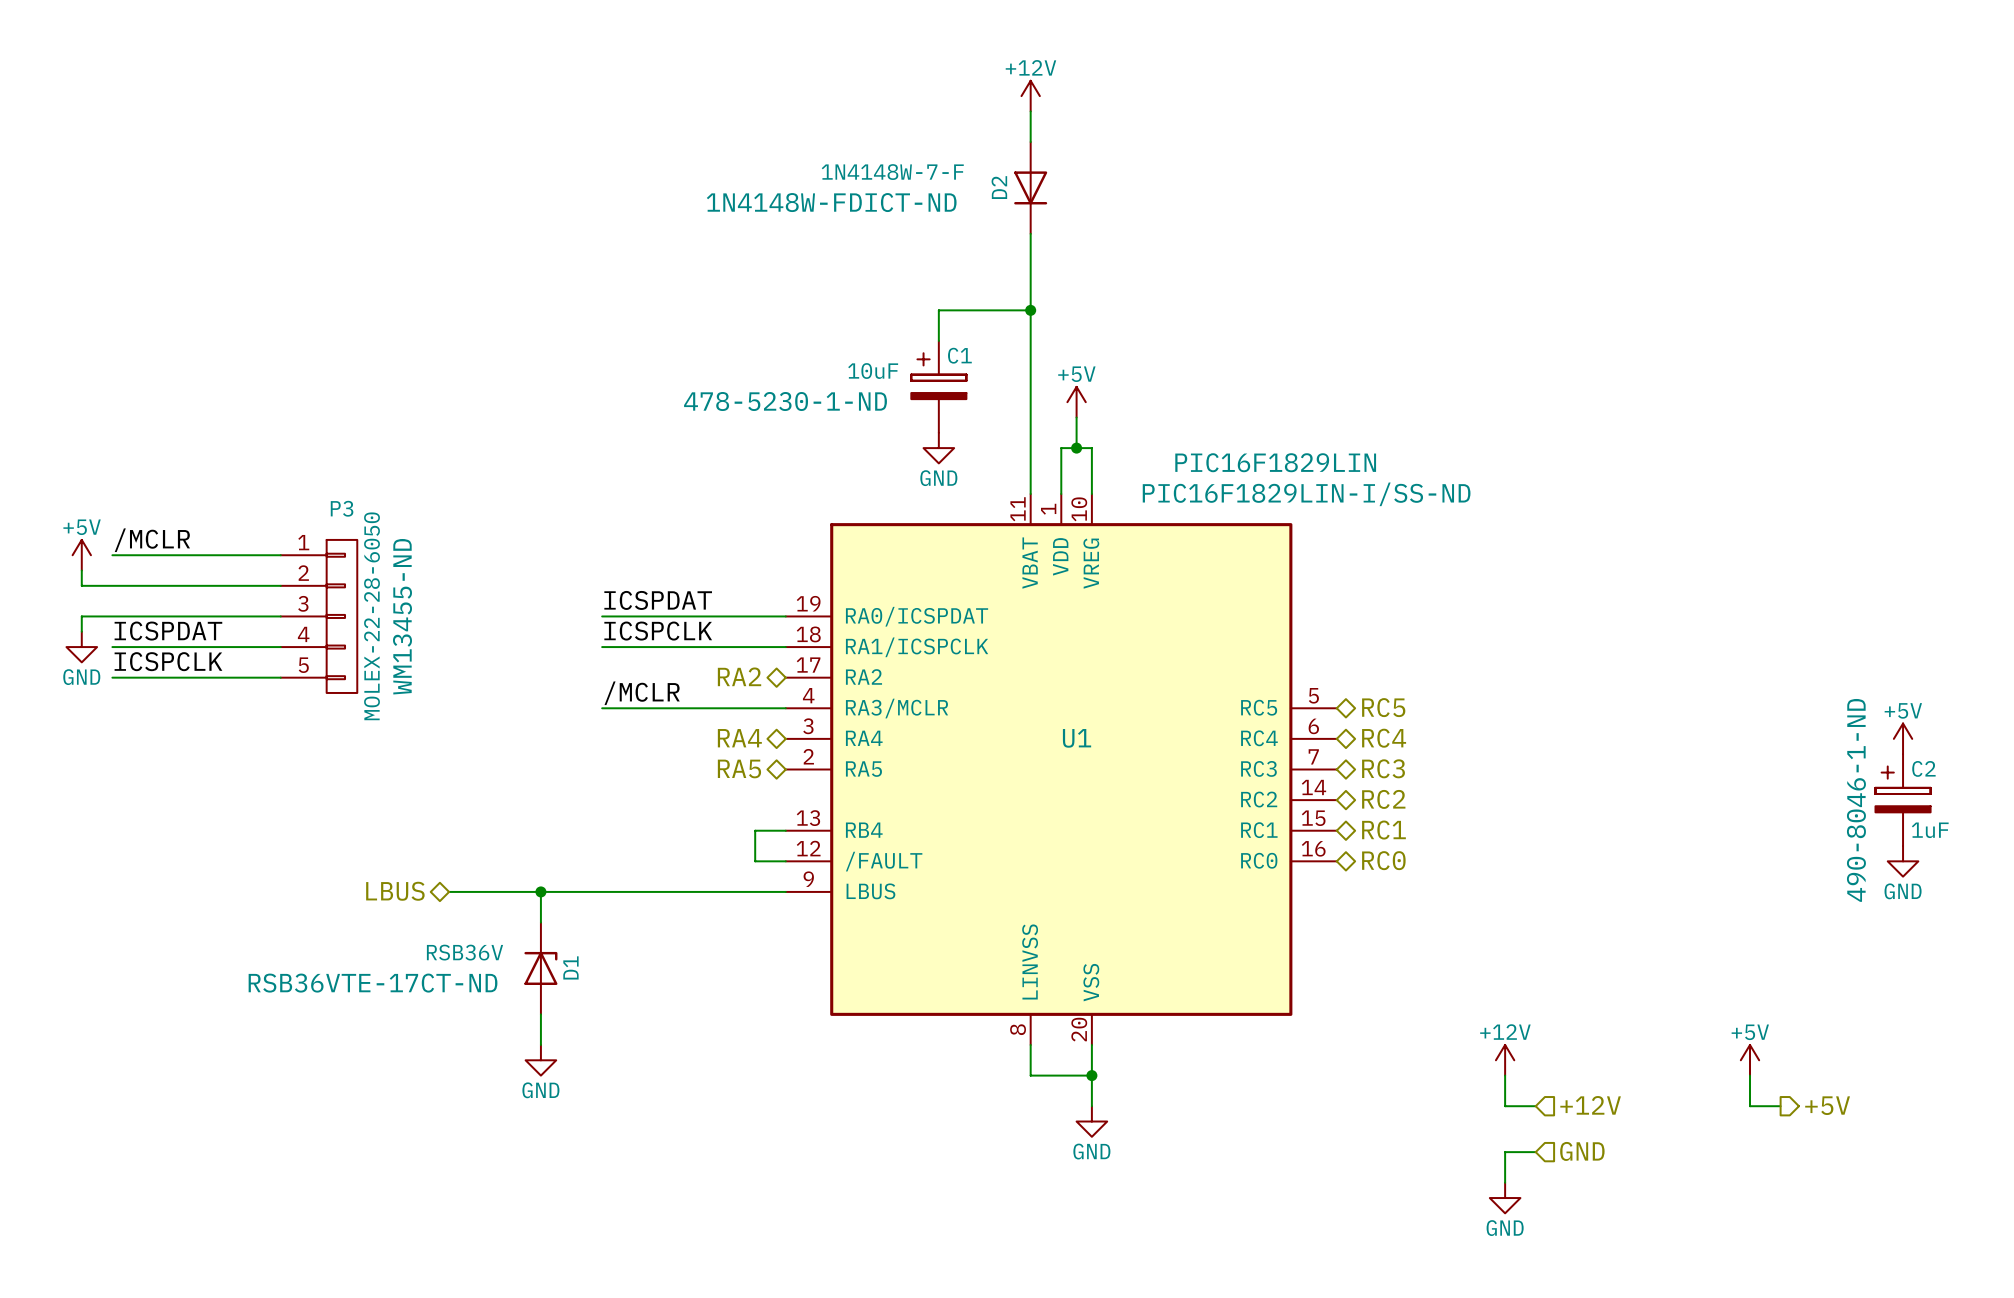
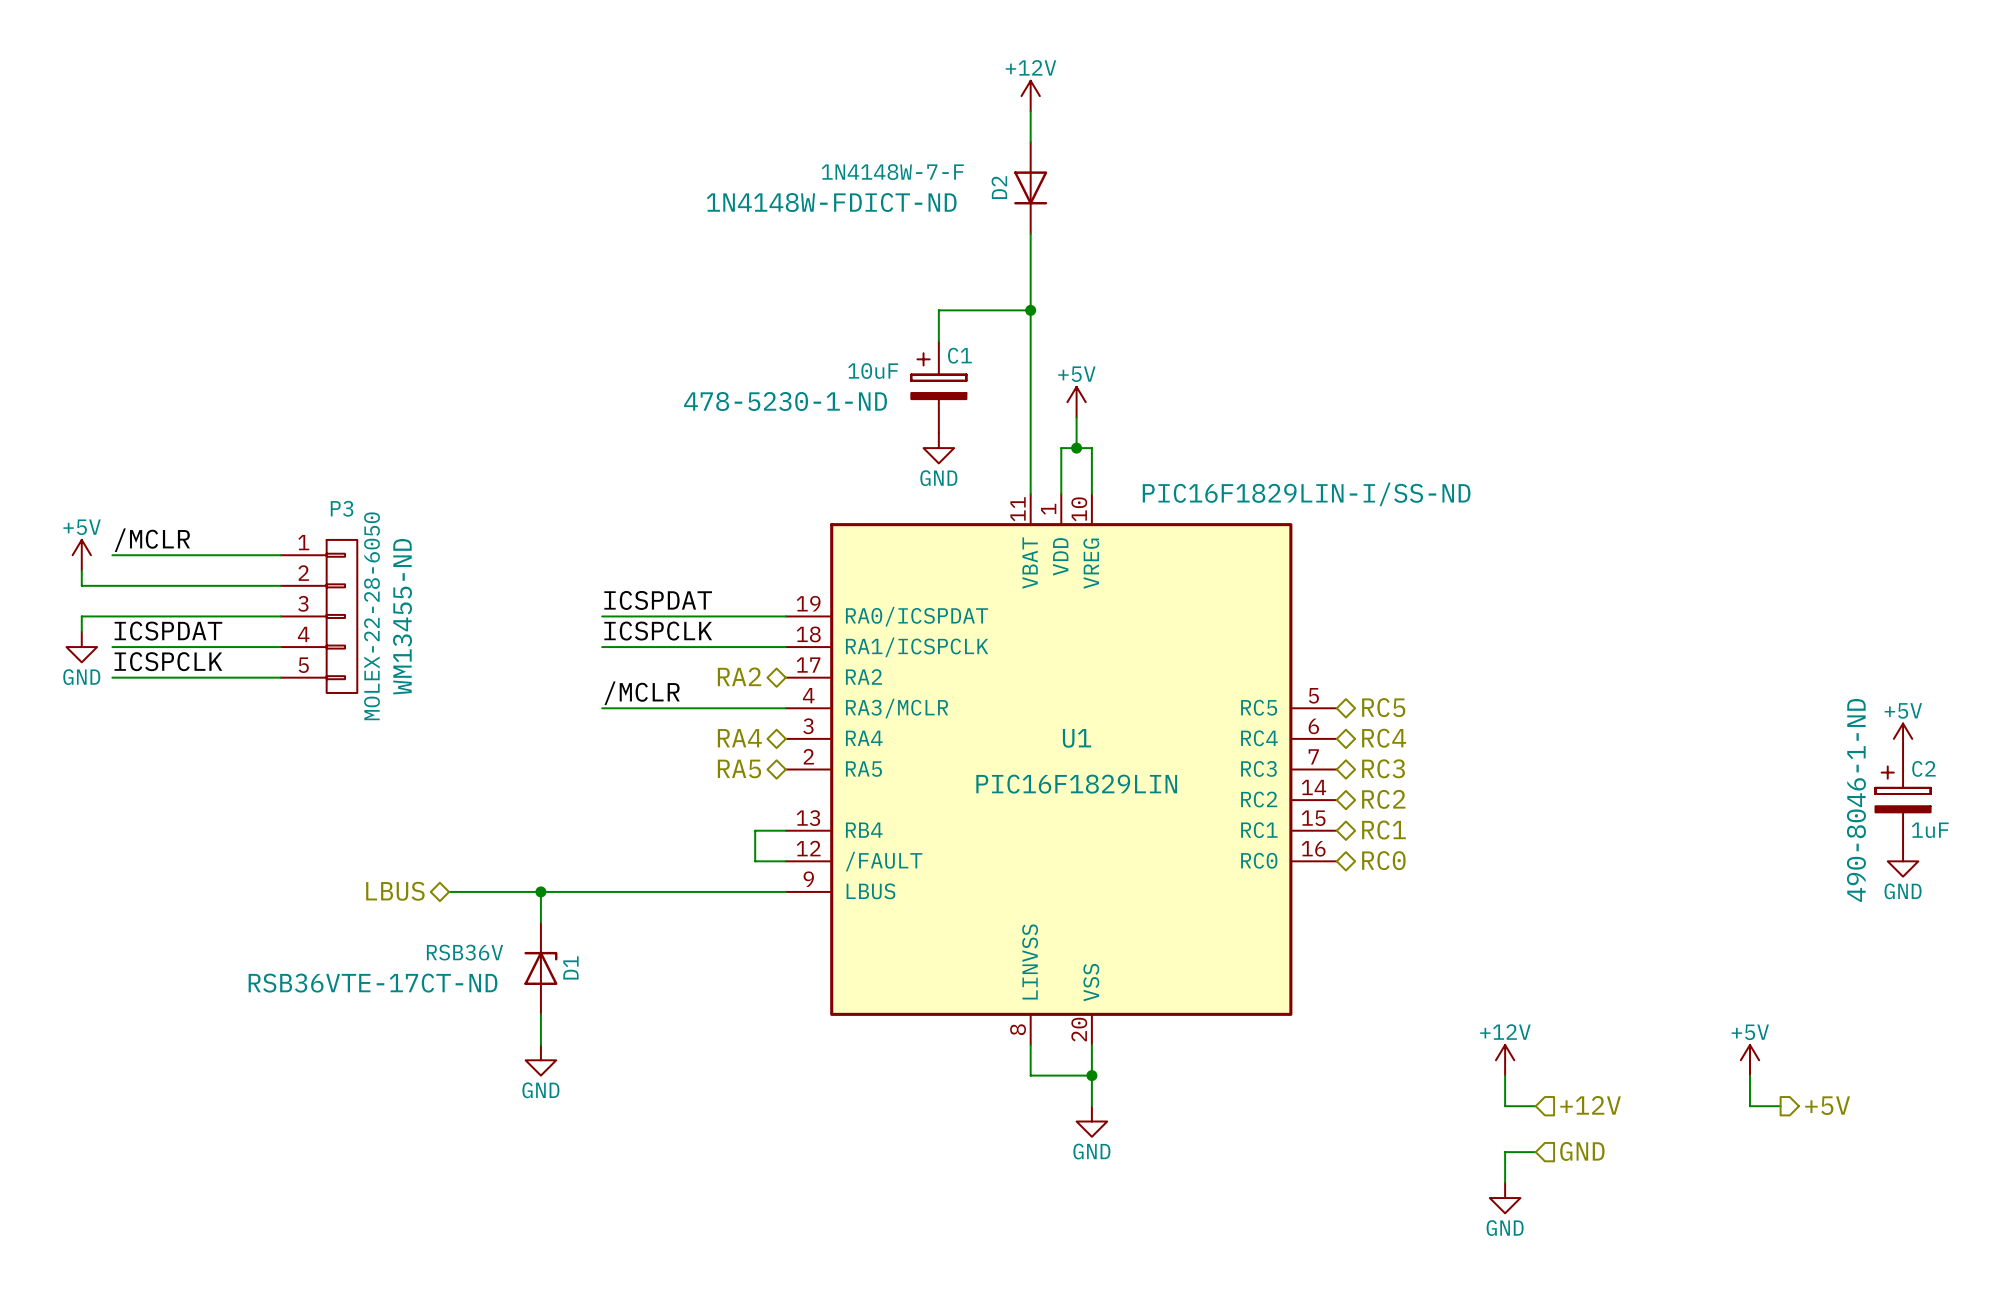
U1 value position: PIC16F1829LIN (1275, 462) -> PIC16F1829LIN (1076, 784)

